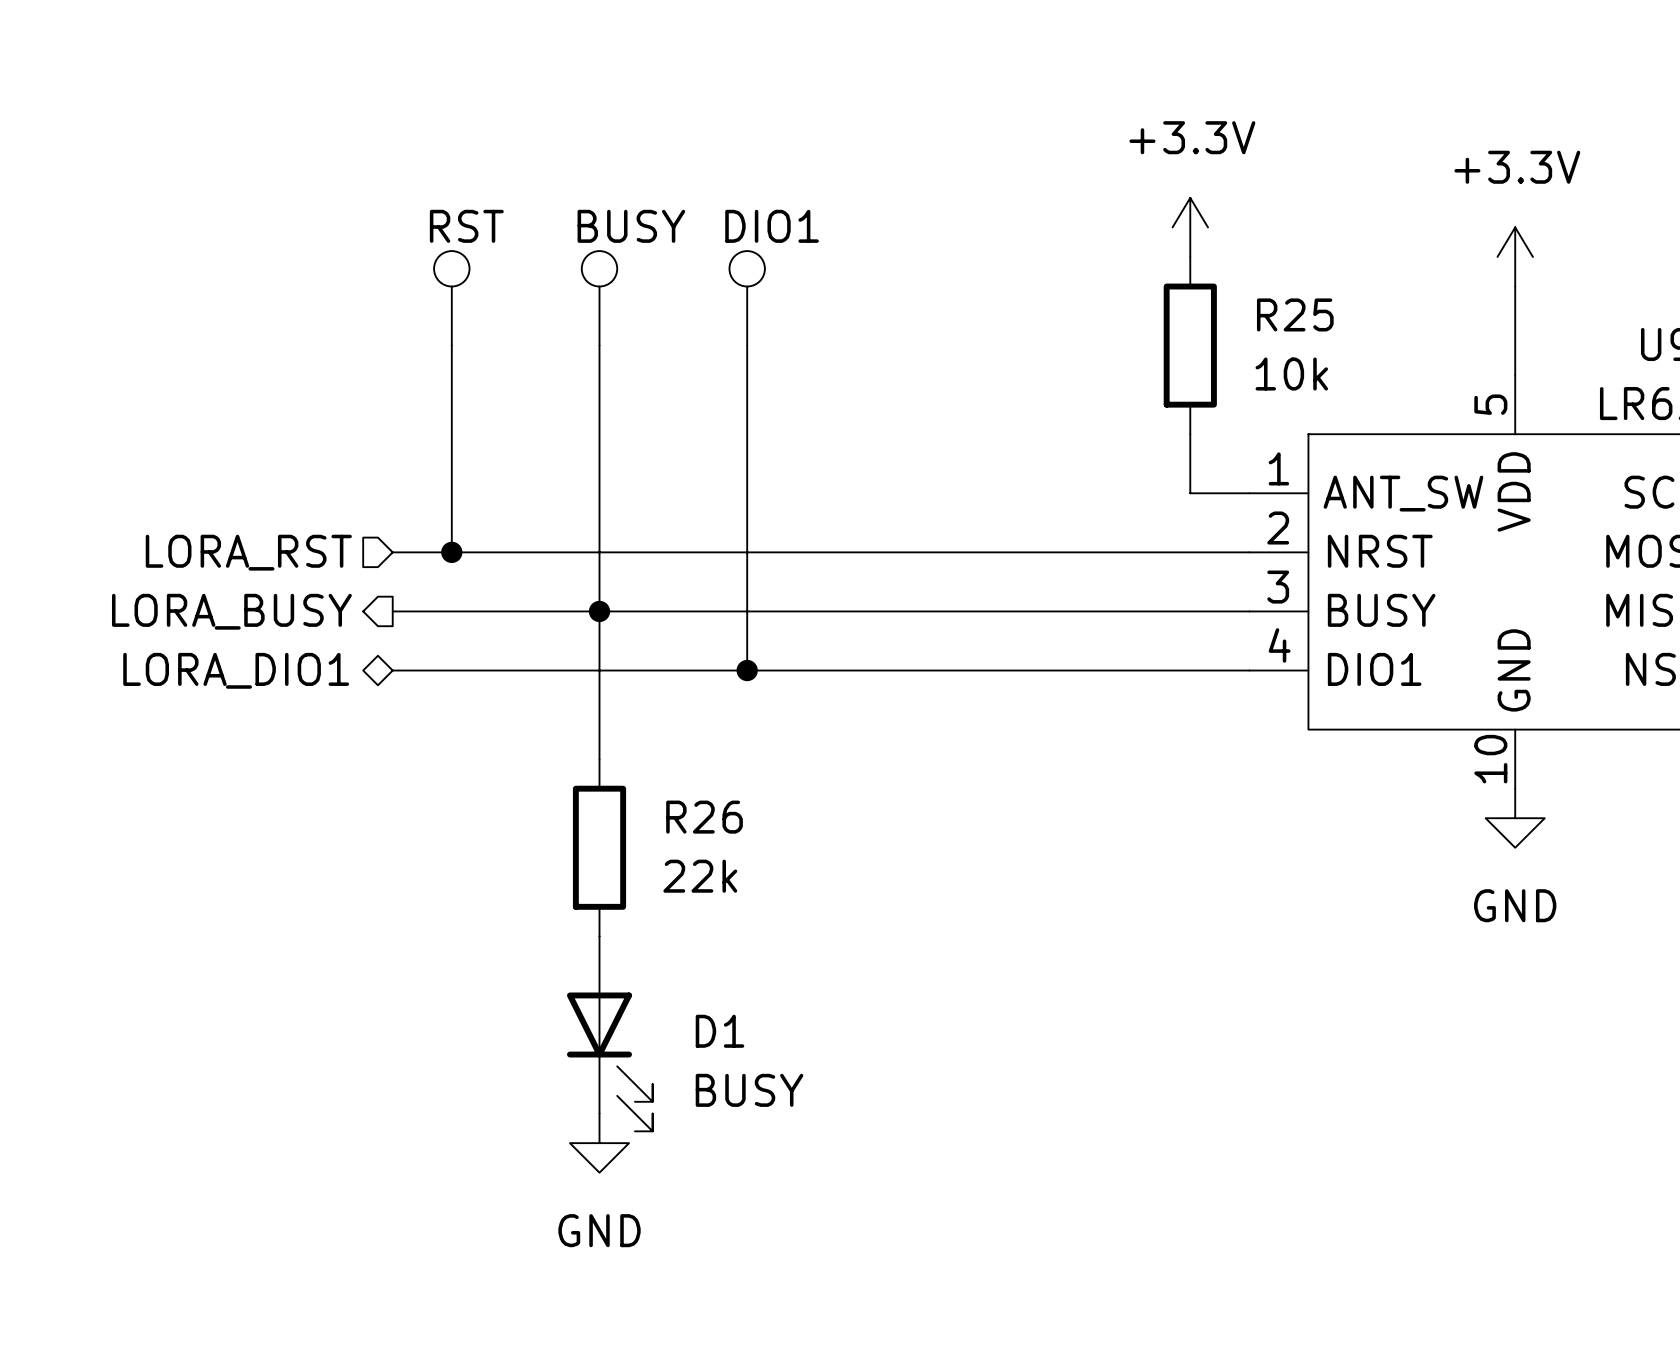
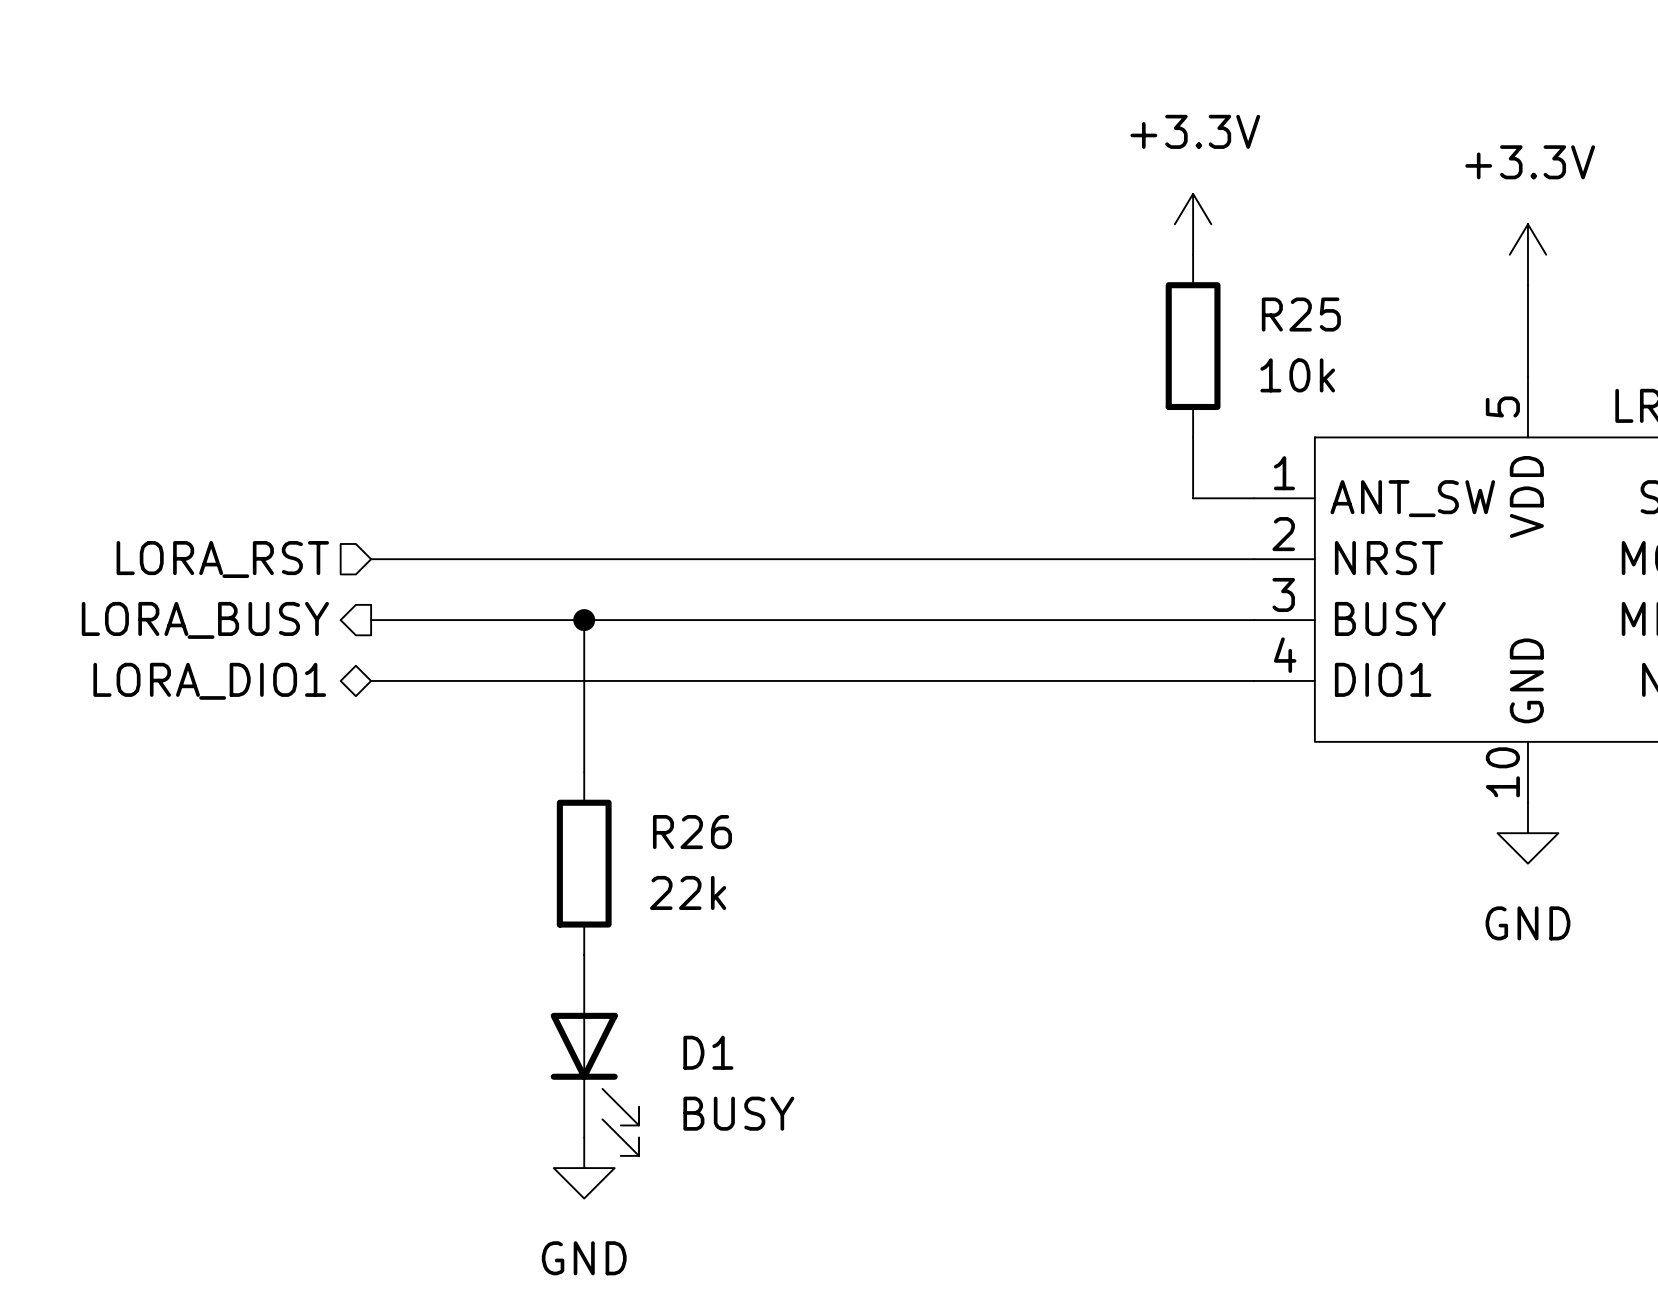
part: RST (451, 298) -> none
part: BUSY (599, 298) -> none
part: DIO1 (747, 298) -> none
wire: (451, 345) (451, 552) -> none
wire: (599, 345) (599, 611) -> none
wire: (747, 345) (747, 670) -> none
junction: (451, 552) -> none
junction: (747, 670) -> none

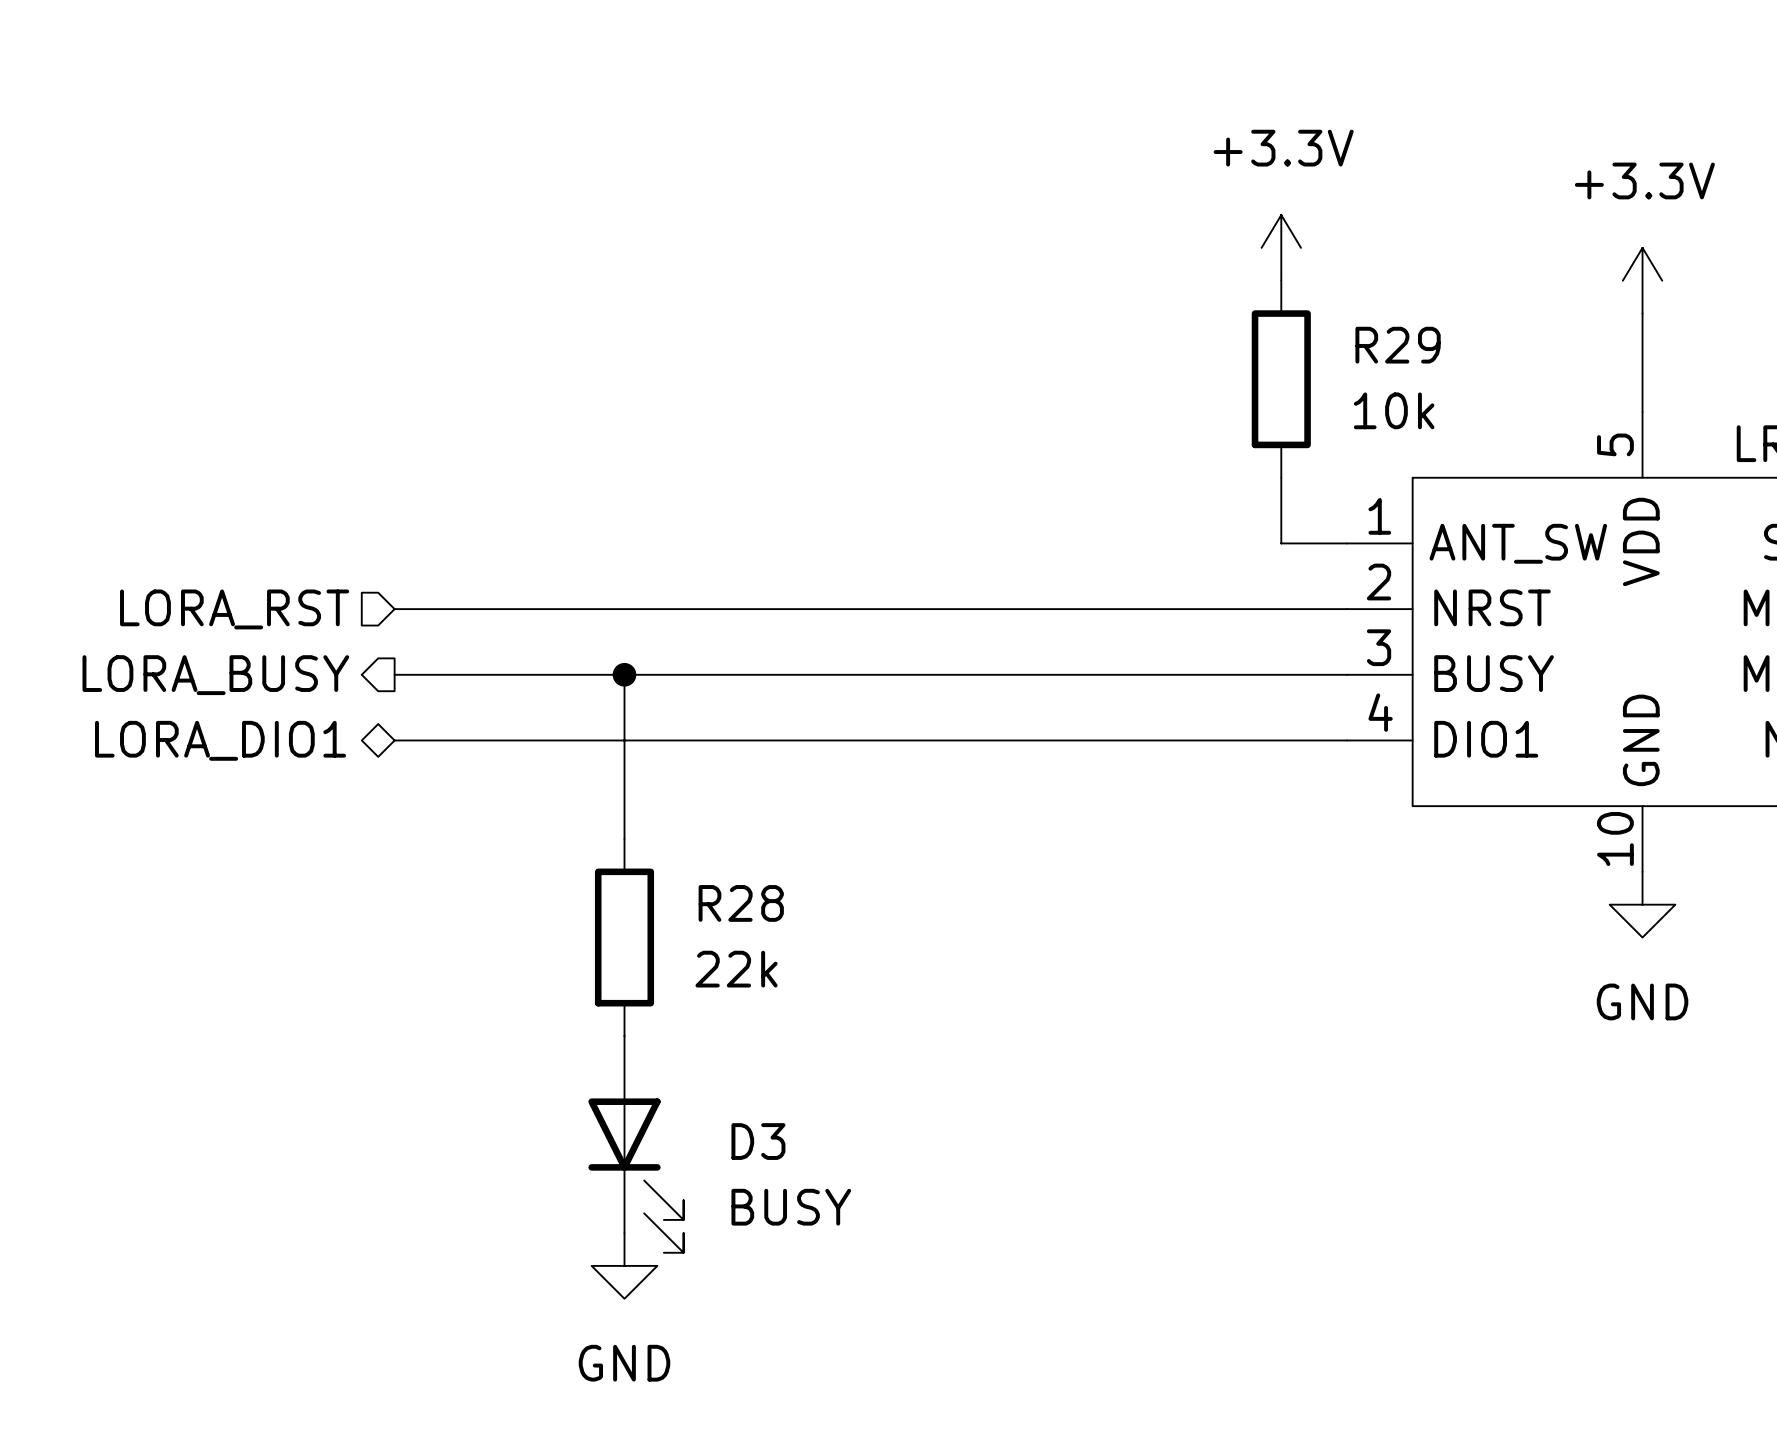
R25 name: R25 (1301, 314) -> R29 (1398, 345)
R26 name: R26 (692, 832) -> R28 (741, 903)
D1 name: D1 (708, 1052) -> D3 (758, 1141)

